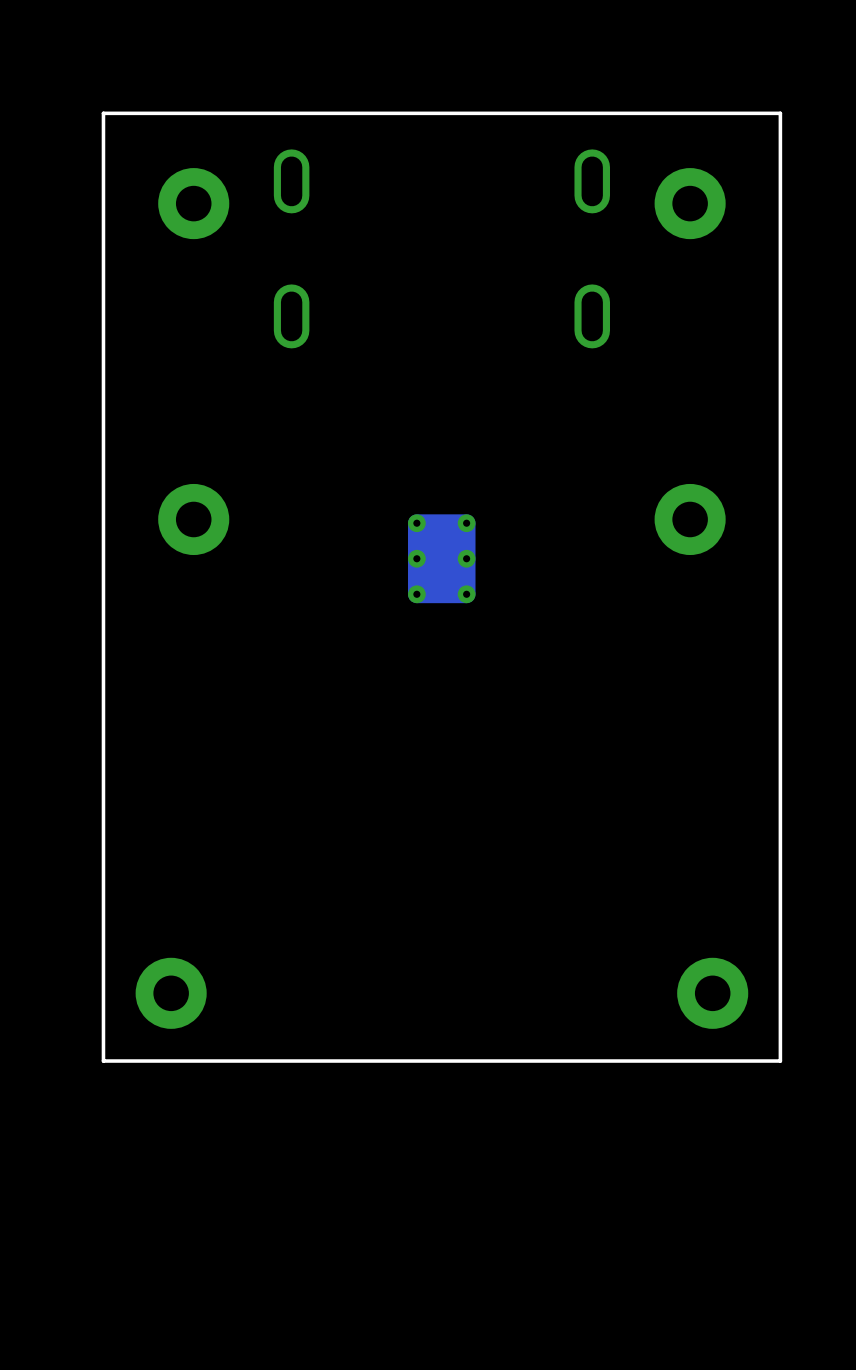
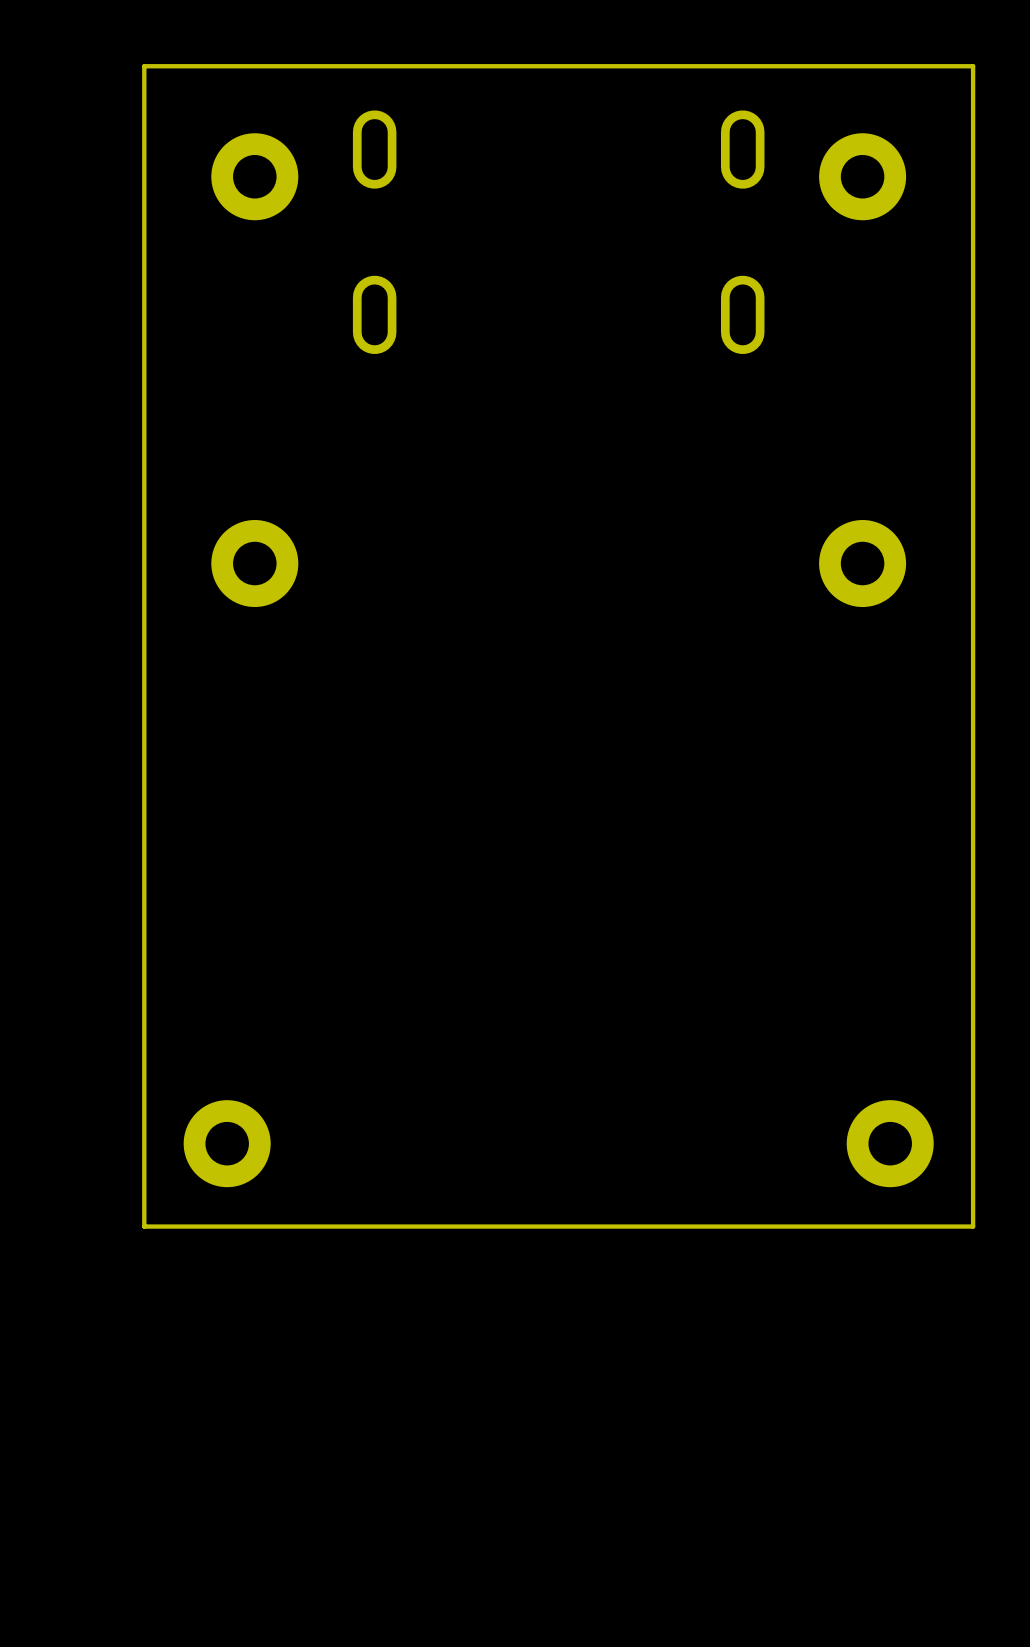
part: (441, 558) -> none

